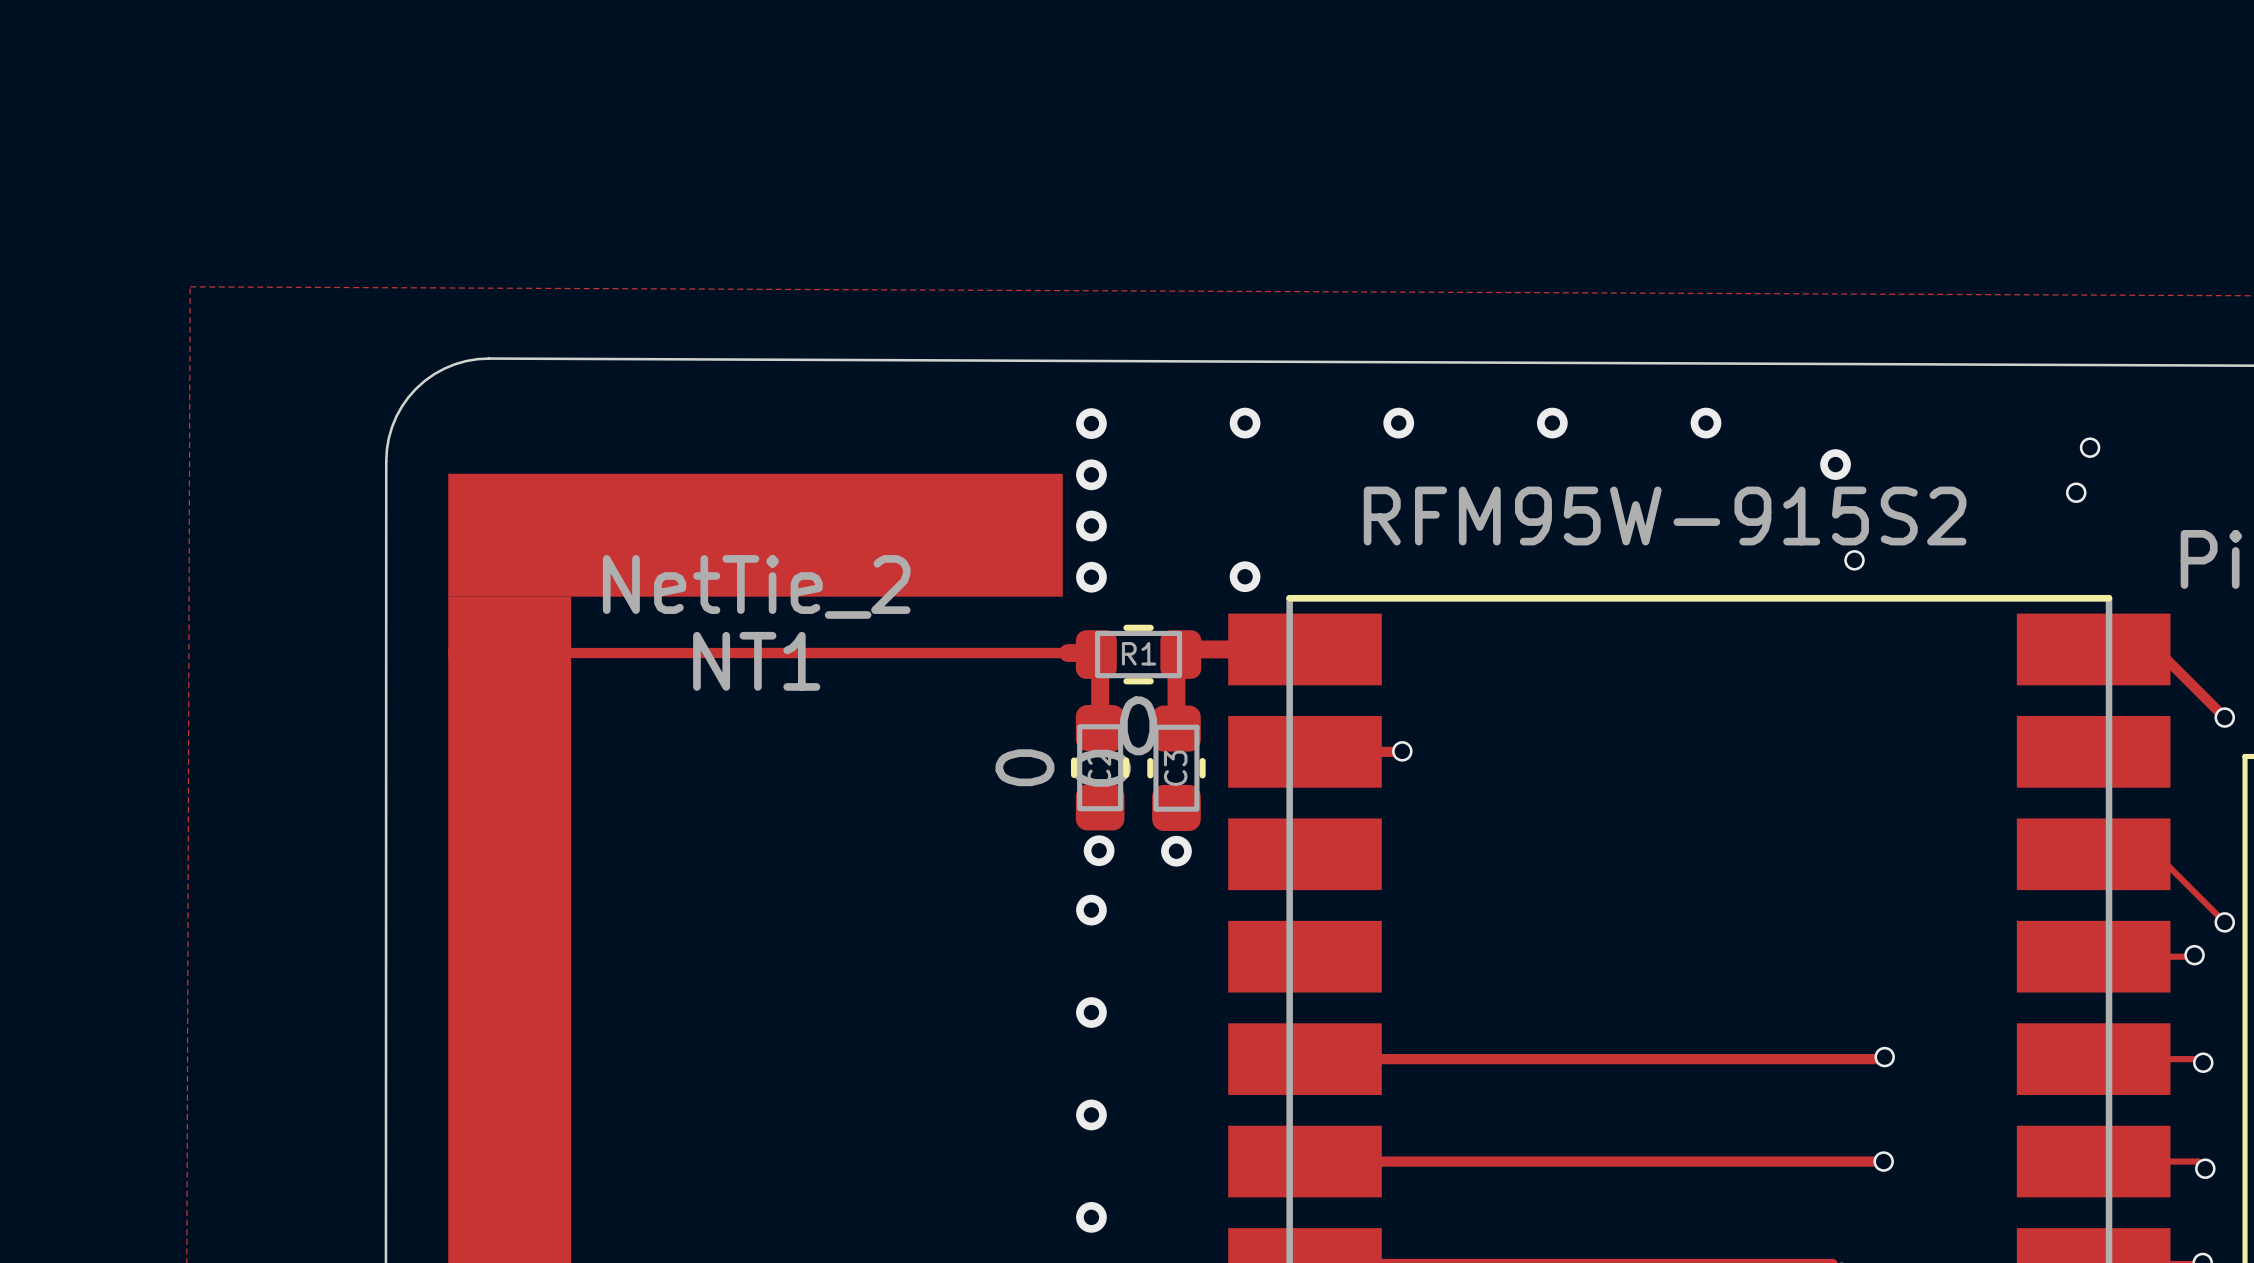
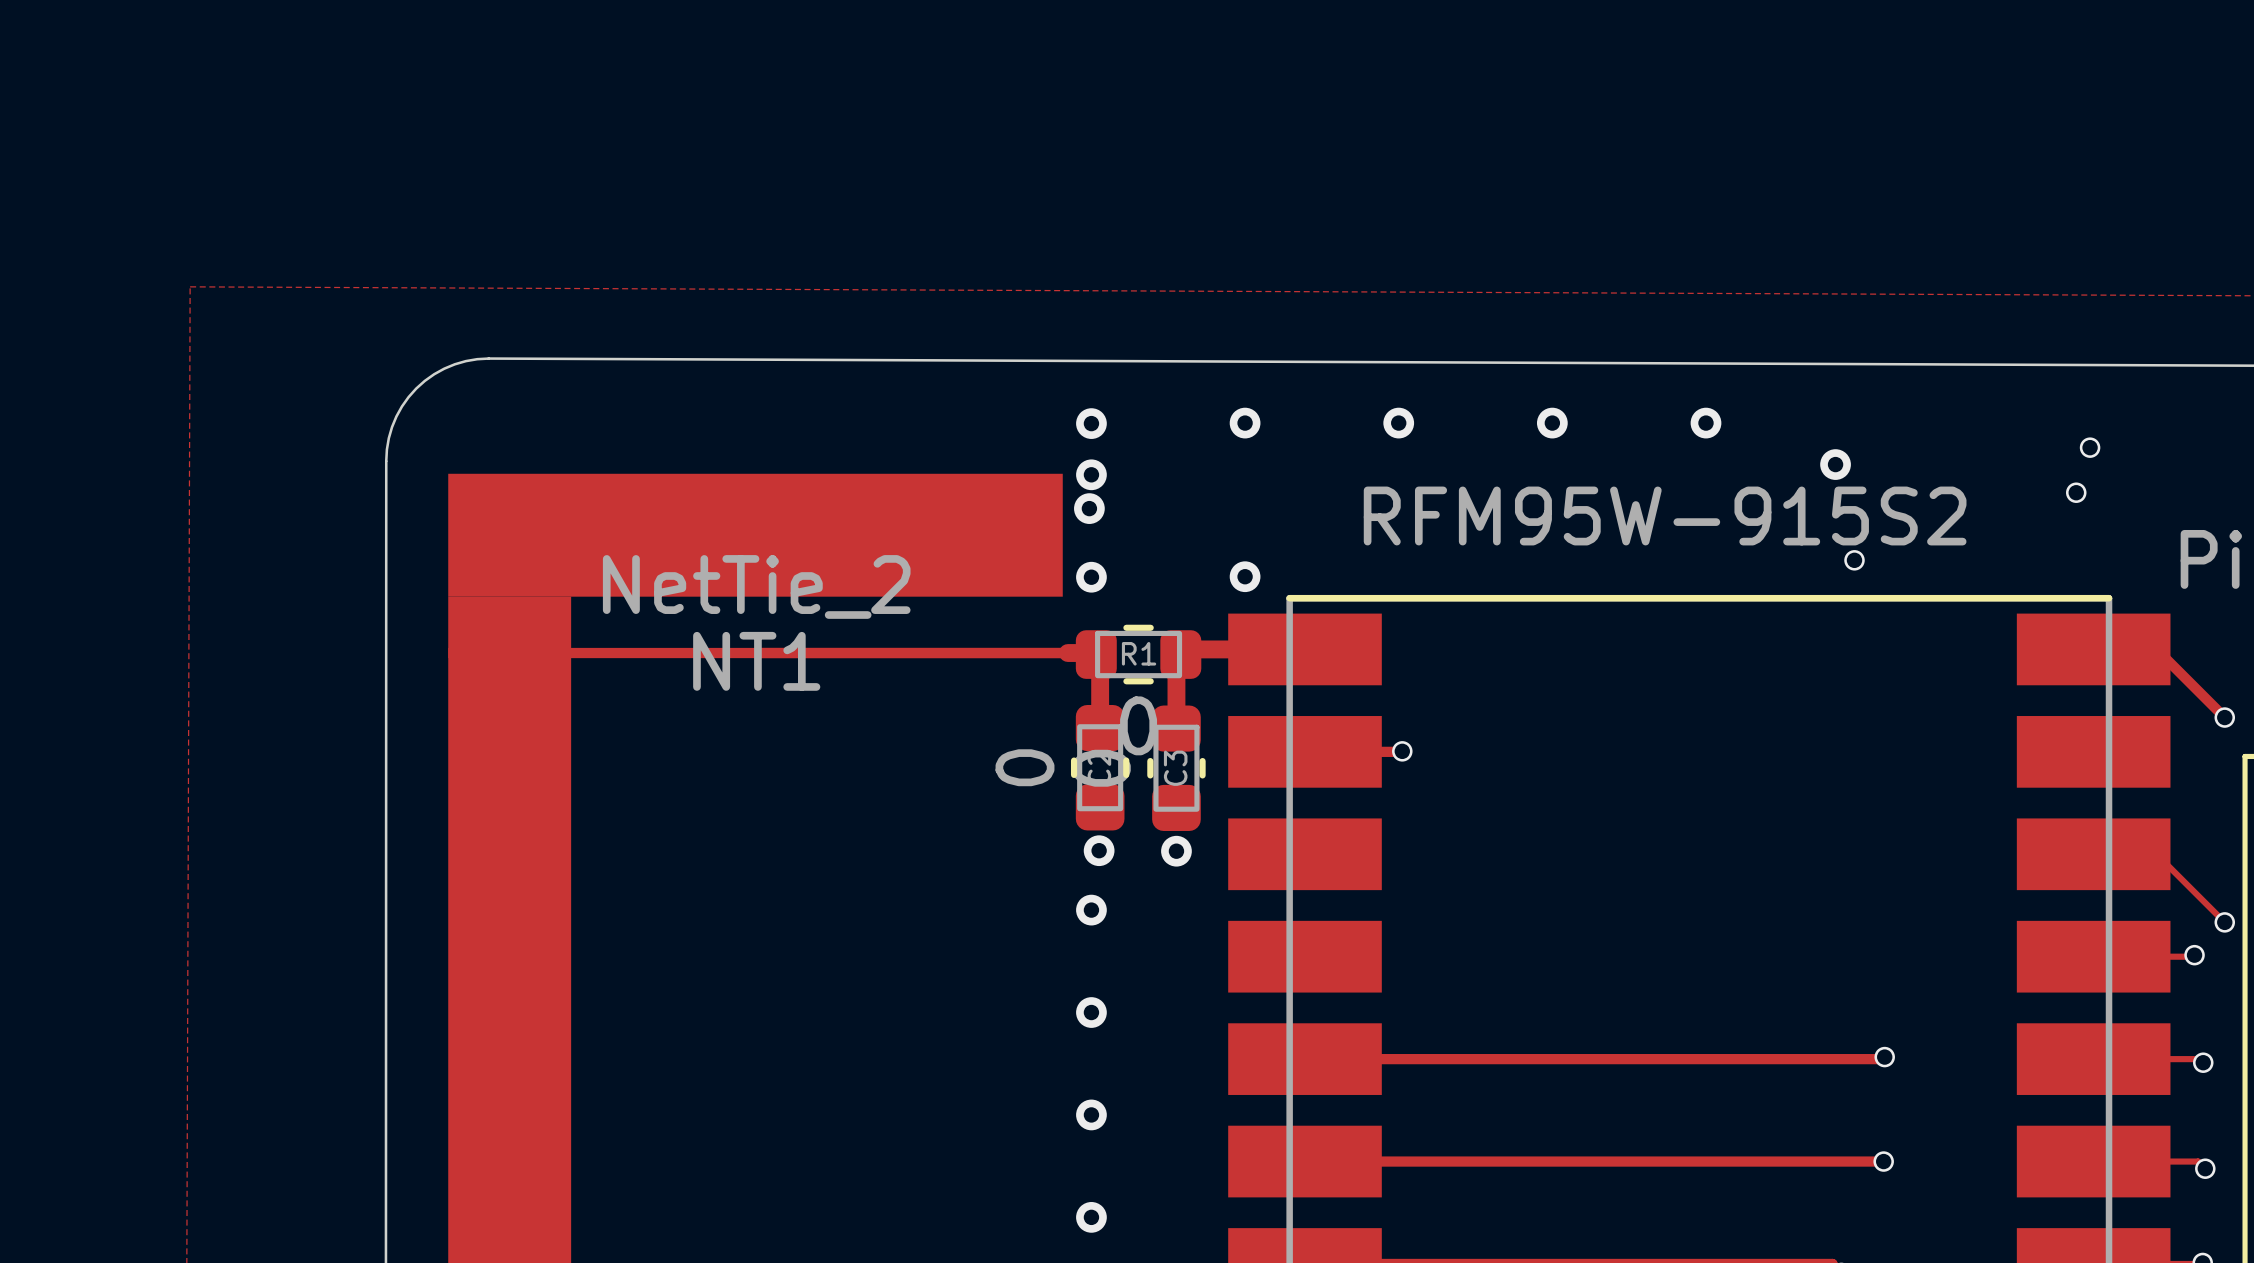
via position: (1091, 526) -> (1089, 508)

